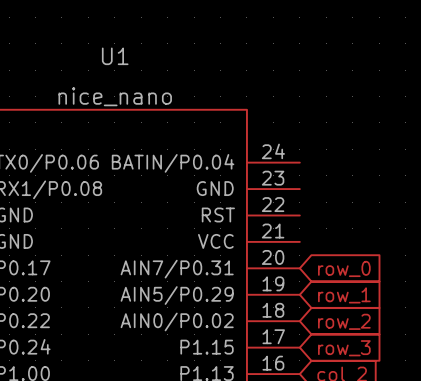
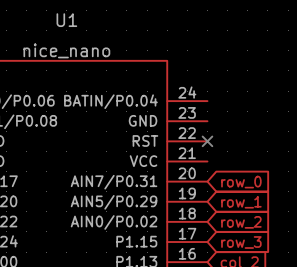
no-connect mark: none -> (207, 141)

